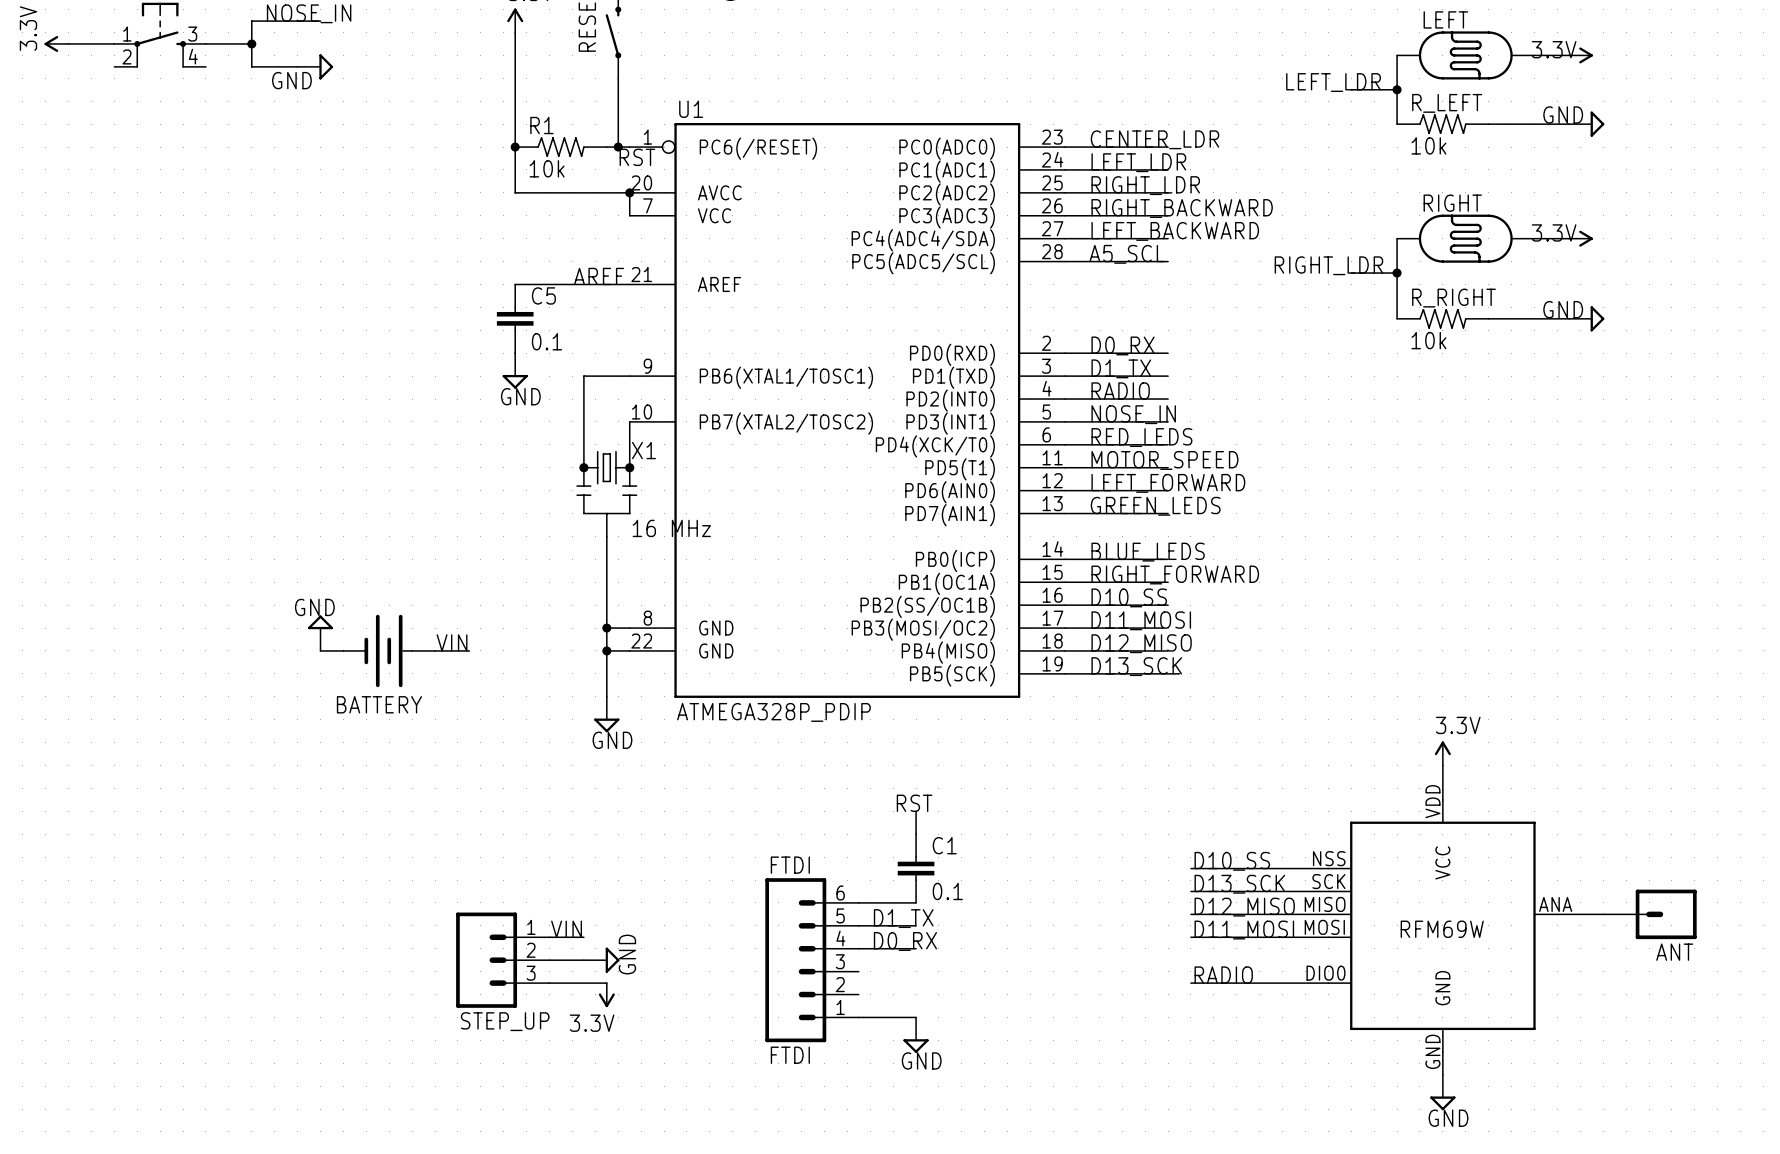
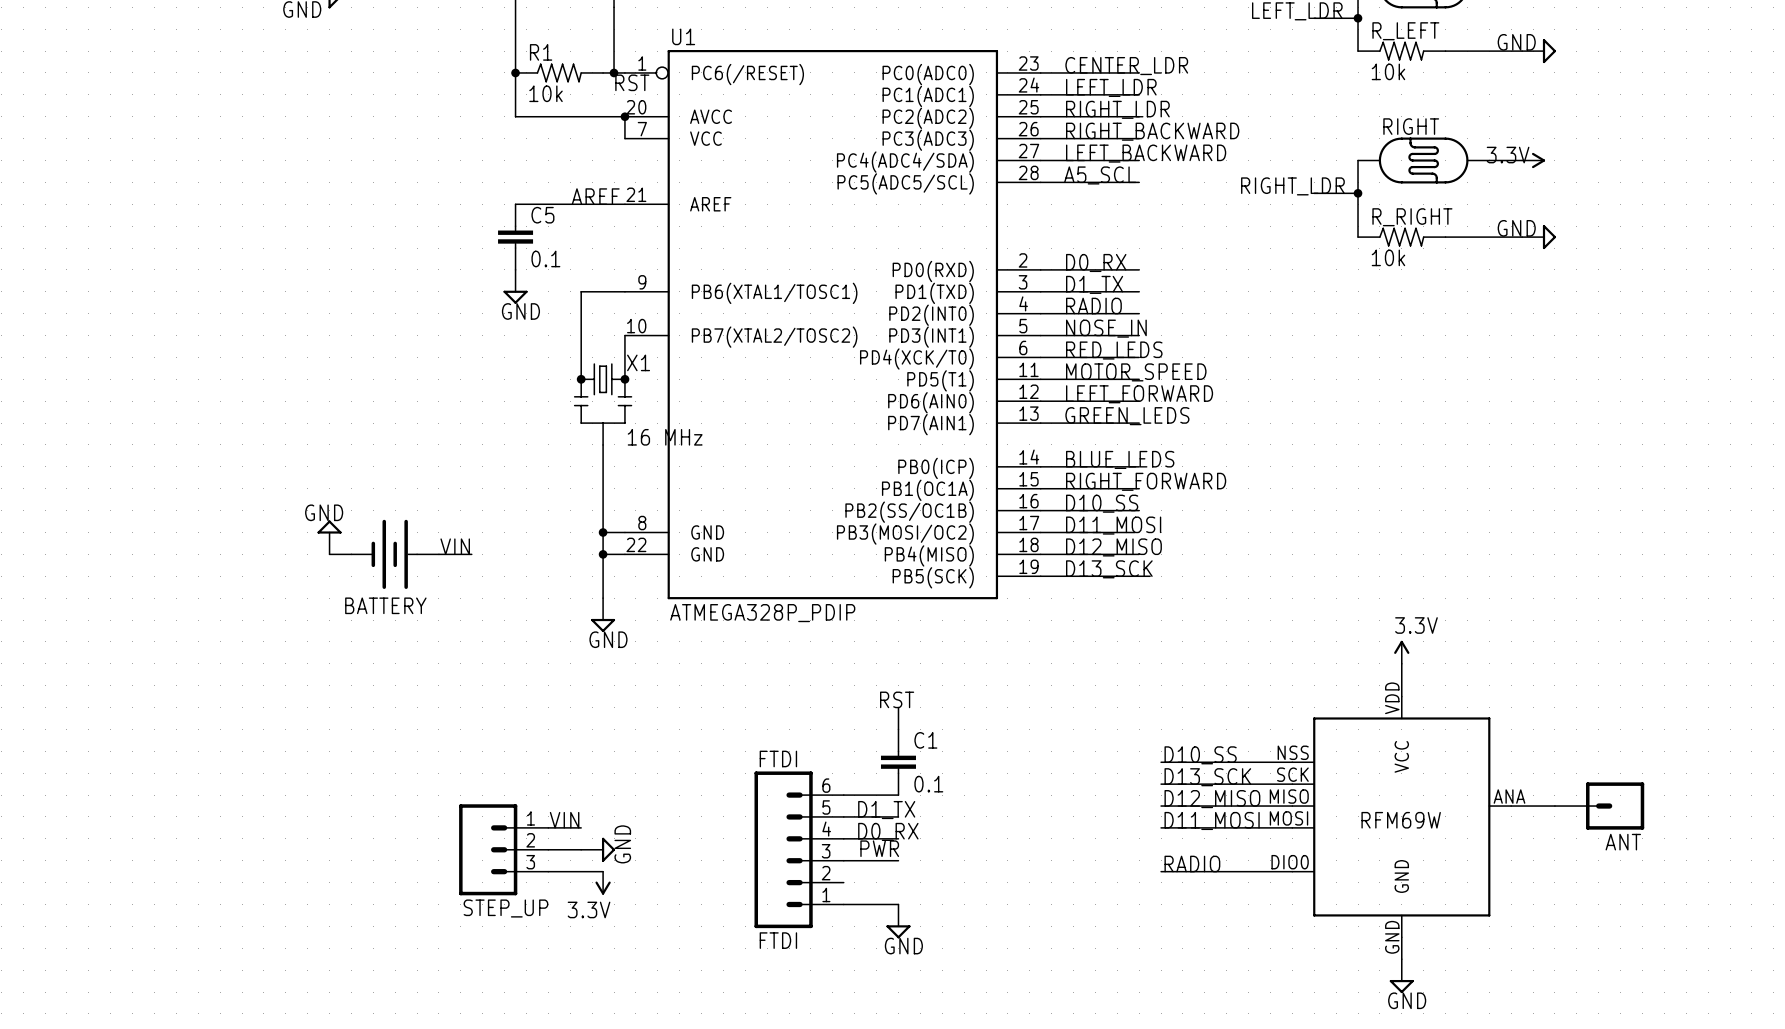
label: none -> PWR (879, 848)
wire: none -> (843, 860) (898, 860)

